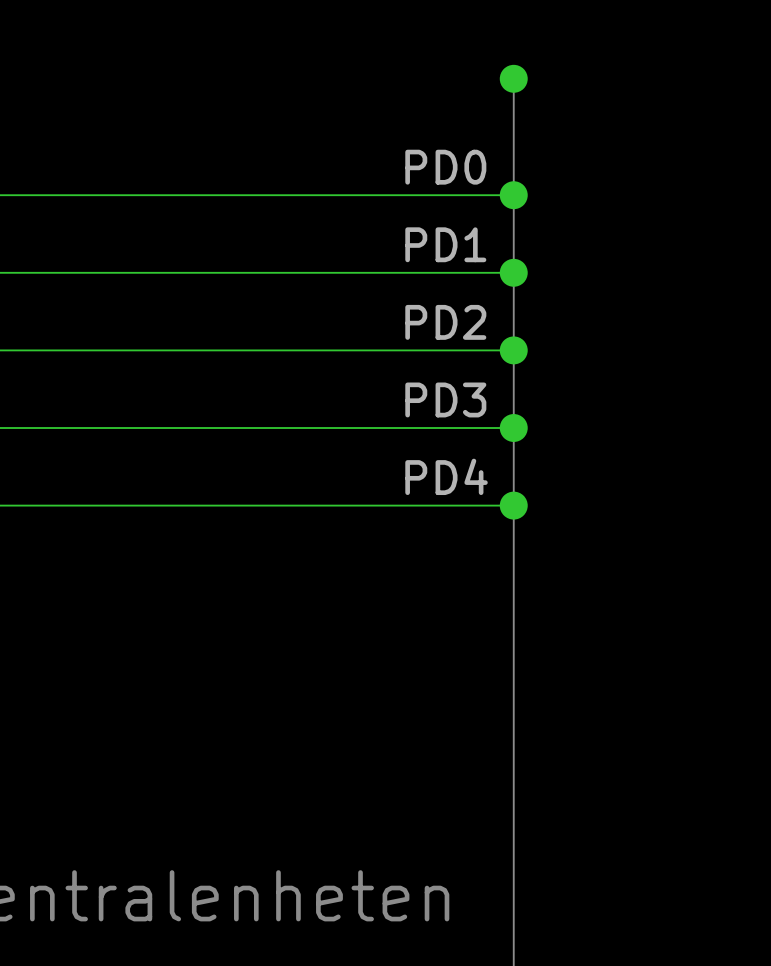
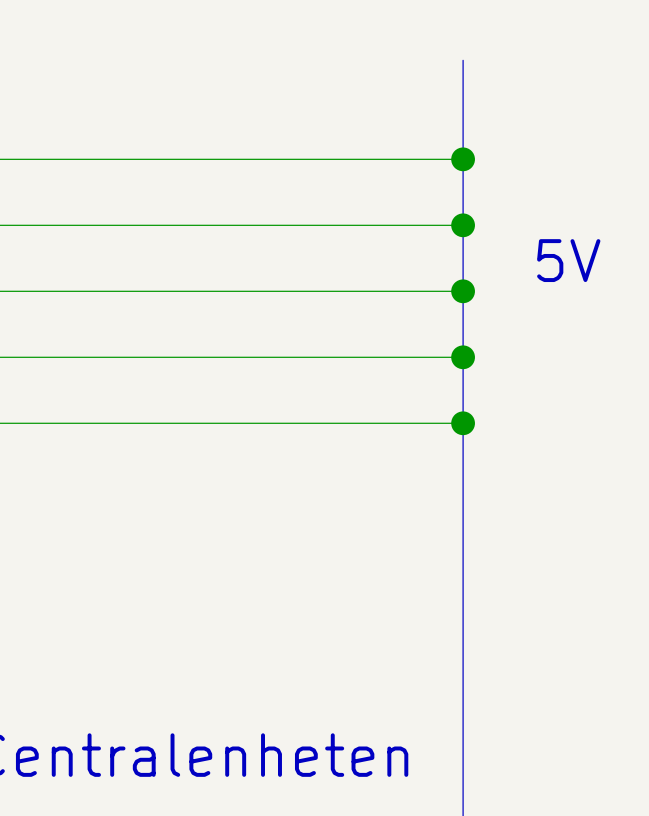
junction: (513, 78) -> none
label: PD0 (445, 167) -> none
label: PD1 (445, 244) -> none
text: none -> 5V (568, 260)
label: PD2 (445, 322) -> none
label: PD3 (445, 399) -> none
label: PD4 (446, 476) -> none

